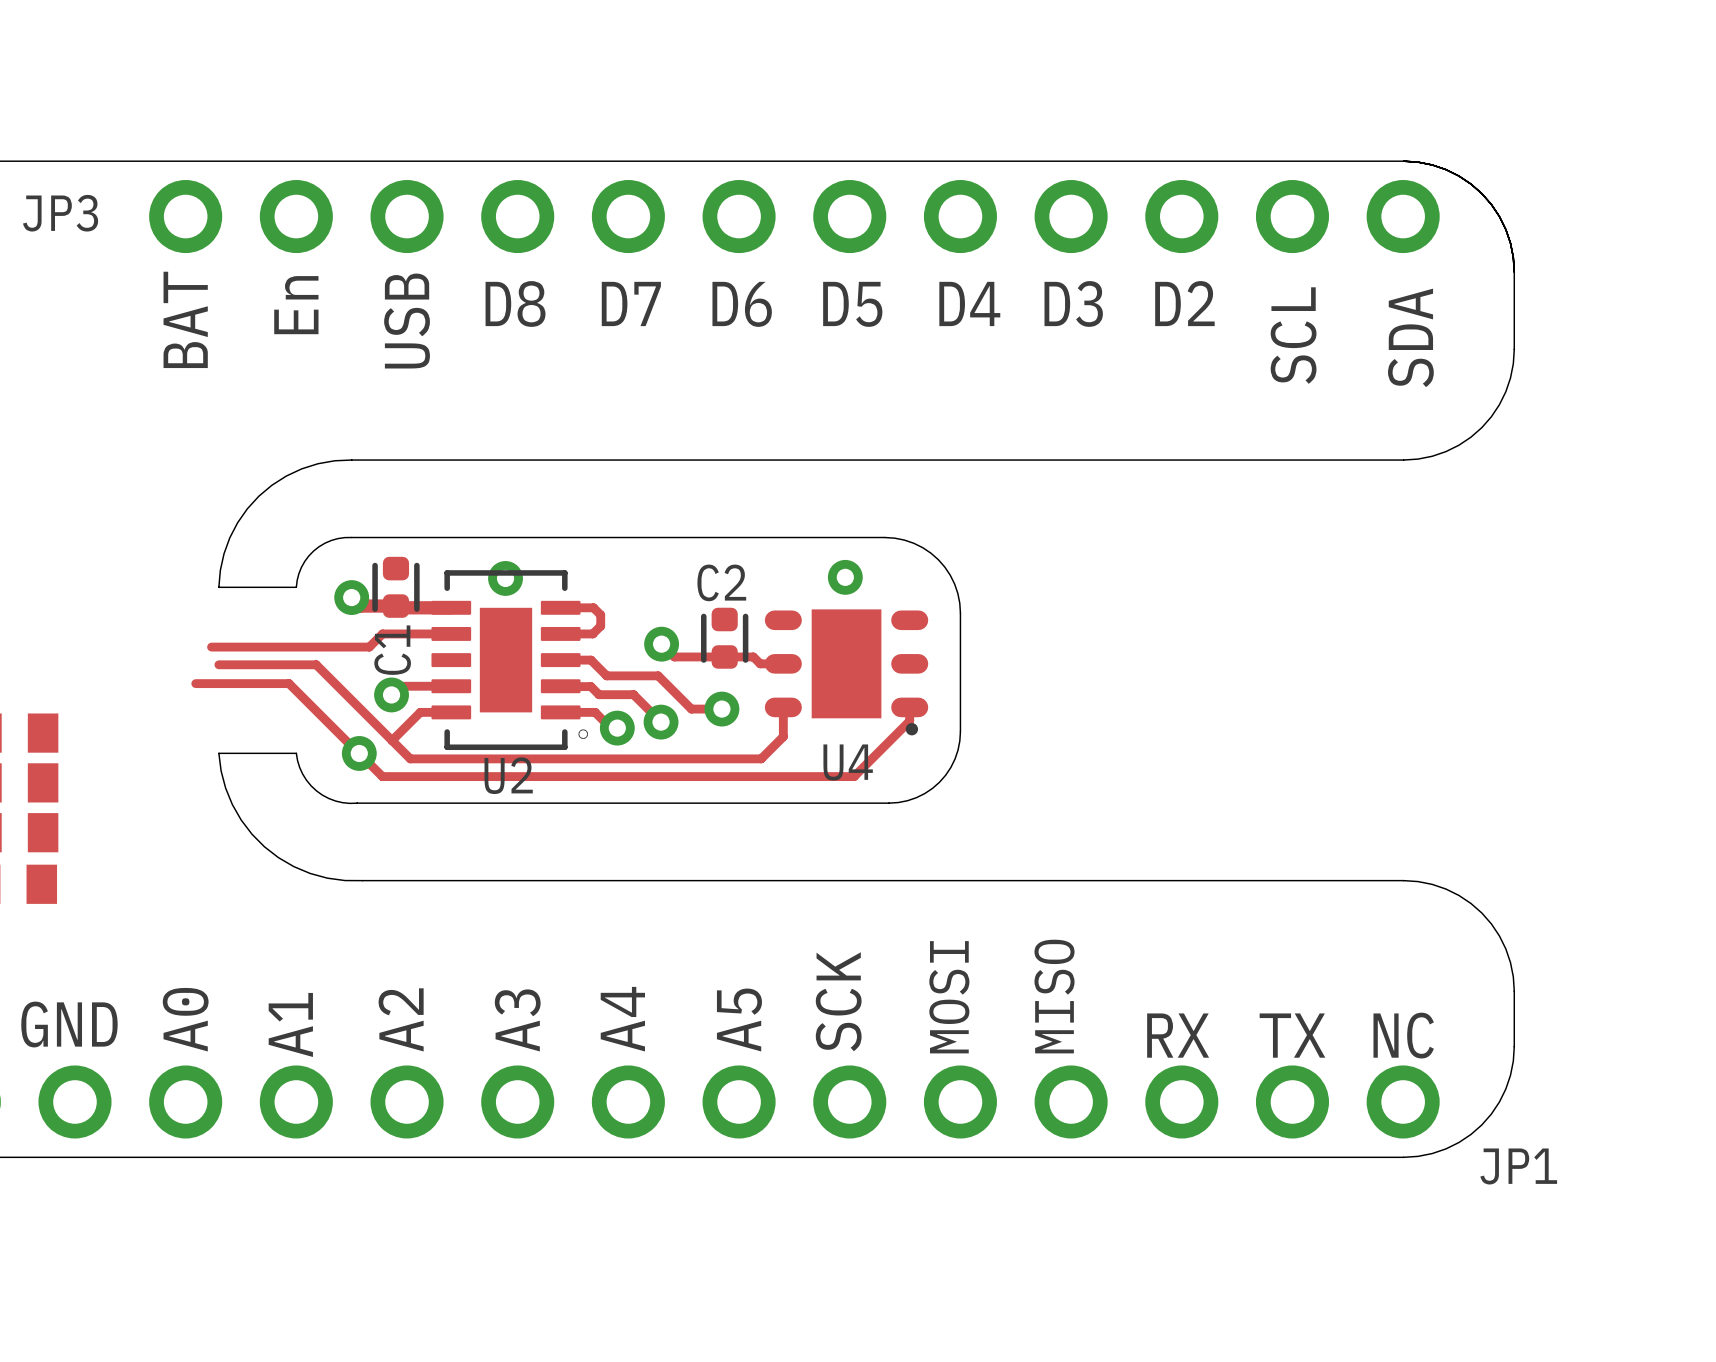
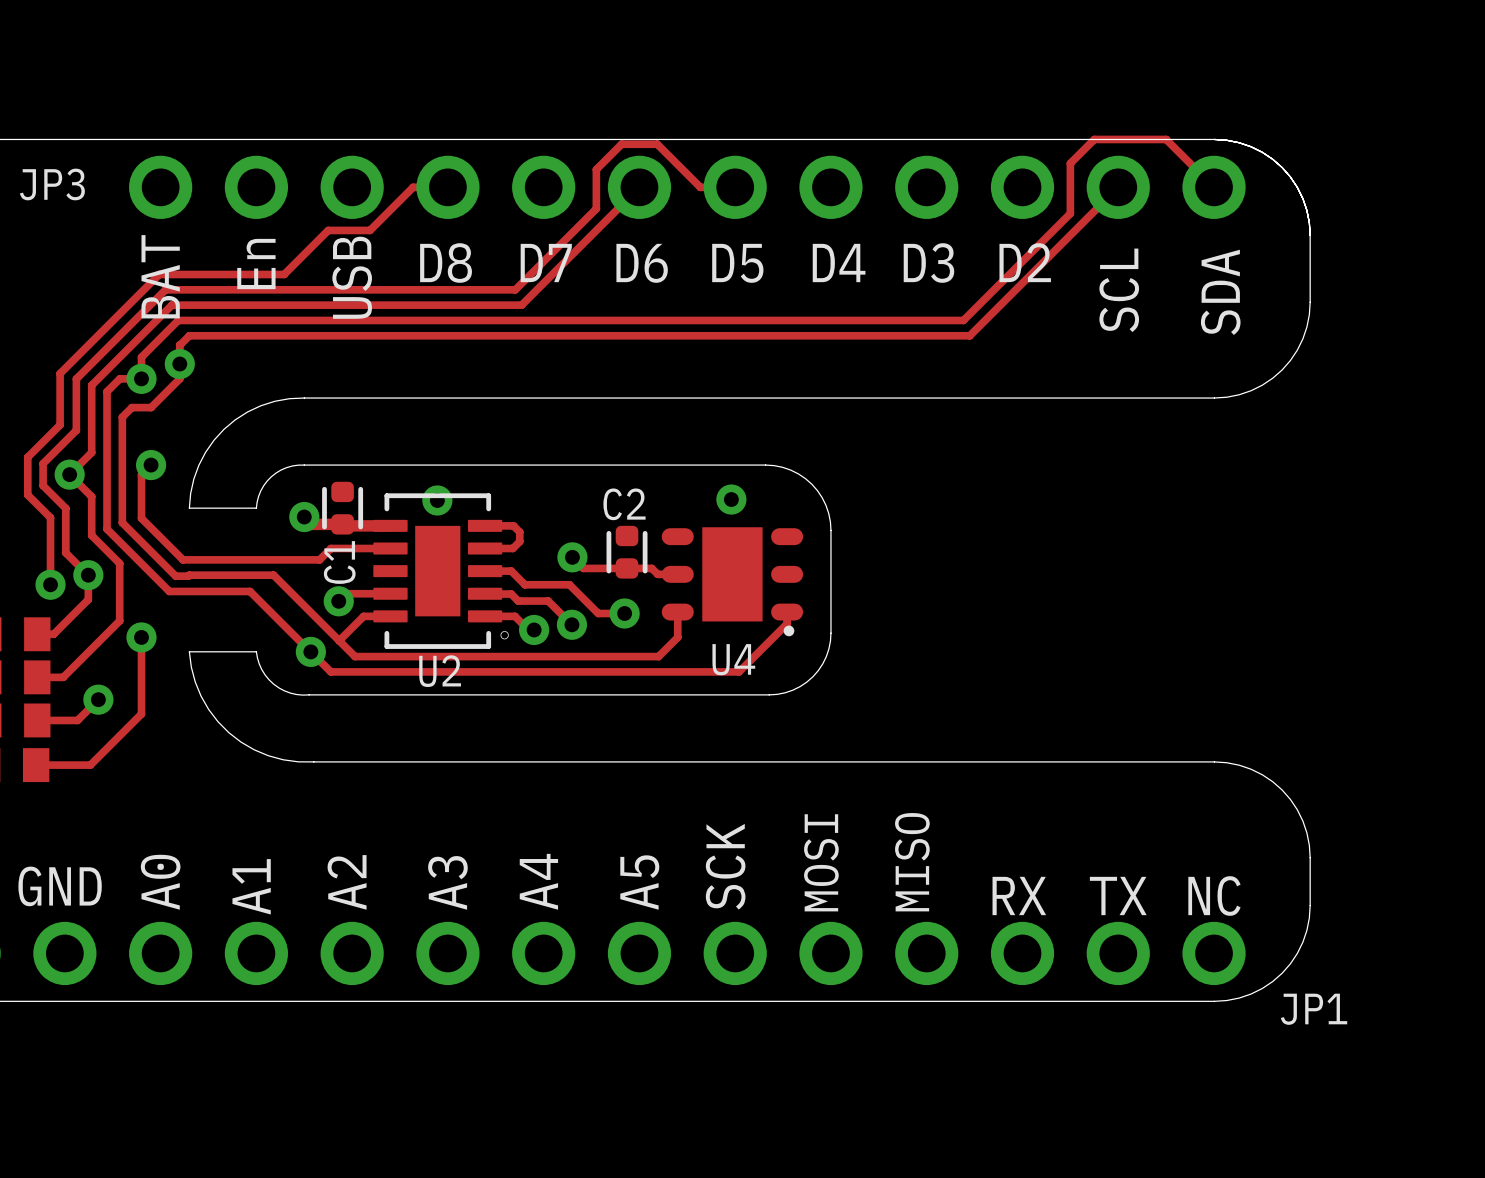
track: none -> (447, 187) (413, 187) (370, 230) (328, 230) (284, 274) (159, 274) (60, 373) (60, 424) (27, 457) (27, 494) (50, 517) (50, 584)
track: none -> (639, 187) (521, 305) (171, 305) (91, 385) (91, 452) (69, 474) (91, 496) (91, 535) (119, 563) (119, 620) (63, 677) (37, 677)
track: none -> (735, 187) (700, 187) (657, 144) (621, 144) (596, 169) (596, 208) (515, 289) (165, 289) (76, 378) (76, 430) (43, 463) (43, 485) (65, 508) (65, 552) (88, 575) (88, 599) (53, 634) (37, 634)
track: none -> (1118, 187) (969, 335) (189, 335) (180, 345) (179, 378) (151, 407) (131, 407) (122, 417) (122, 522) (175, 576) (189, 575)
track: none -> (1214, 187) (1166, 139) (1094, 139) (1070, 163) (1070, 213) (963, 320) (178, 320) (141, 357) (141, 378) (119, 378) (107, 391) (107, 529) (169, 591)
via: none -> (179, 364)
via: none -> (141, 378)
track: none -> (151, 465) (141, 474) (141, 518) (183, 559)
via: none -> (151, 465)
via: none -> (69, 474)
via: none -> (88, 575)
via: none -> (50, 584)
track: none -> (141, 637) (141, 714) (90, 765) (36, 765)
via: none -> (141, 637)
track: none -> (98, 699) (77, 720) (37, 720)
via: none -> (98, 699)

